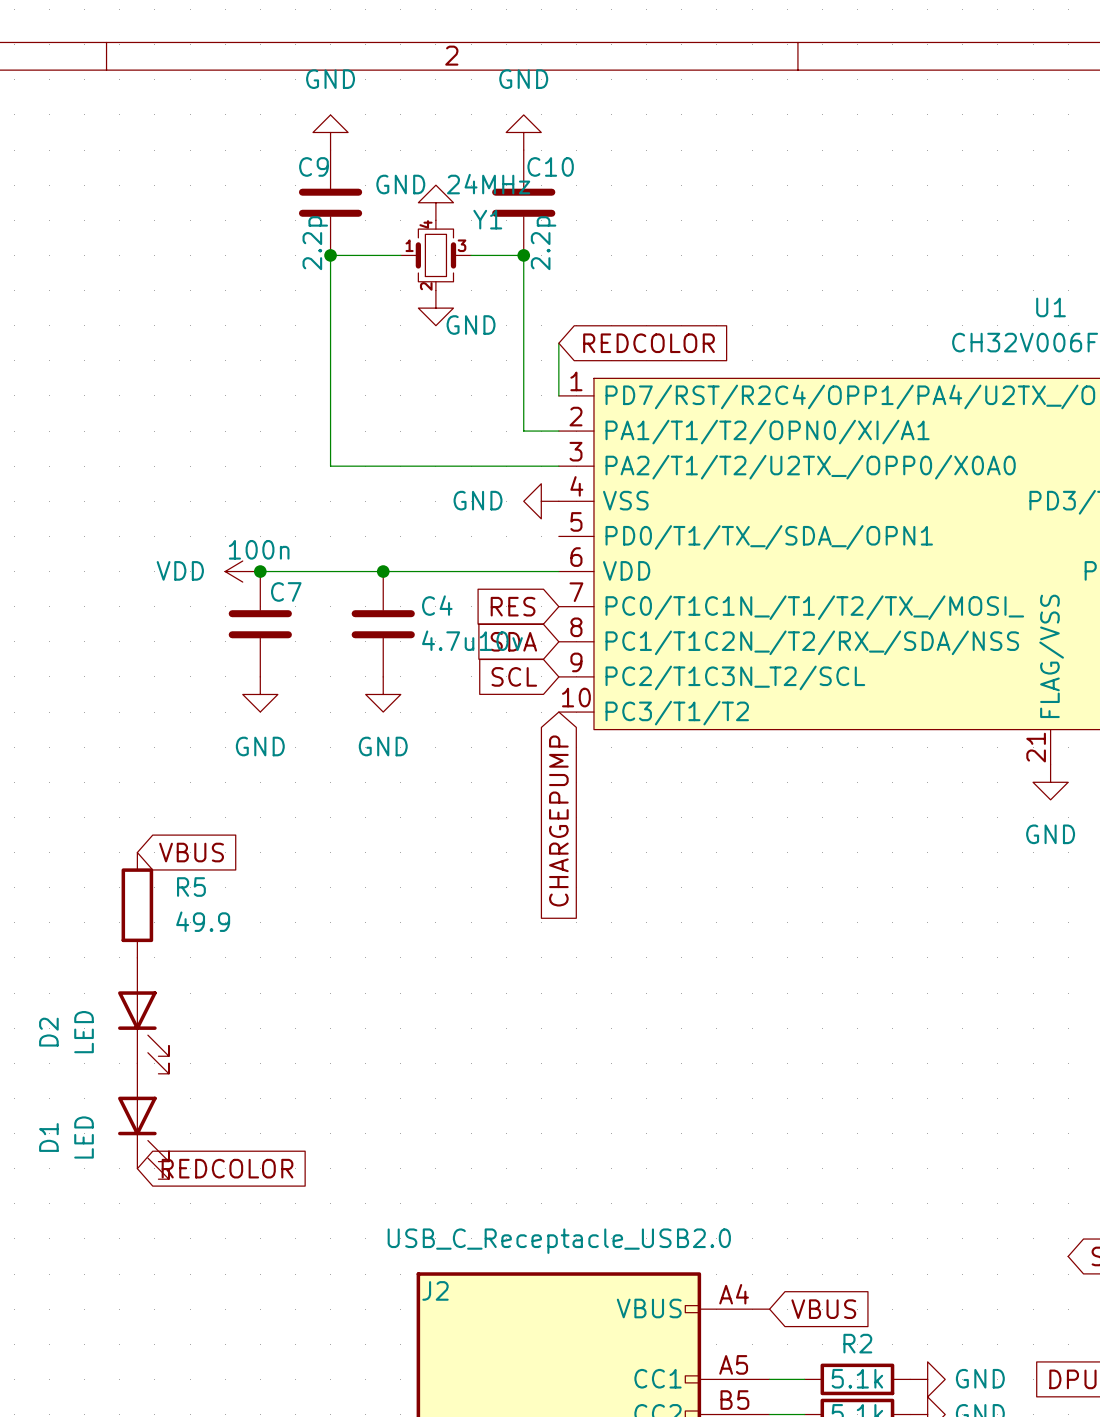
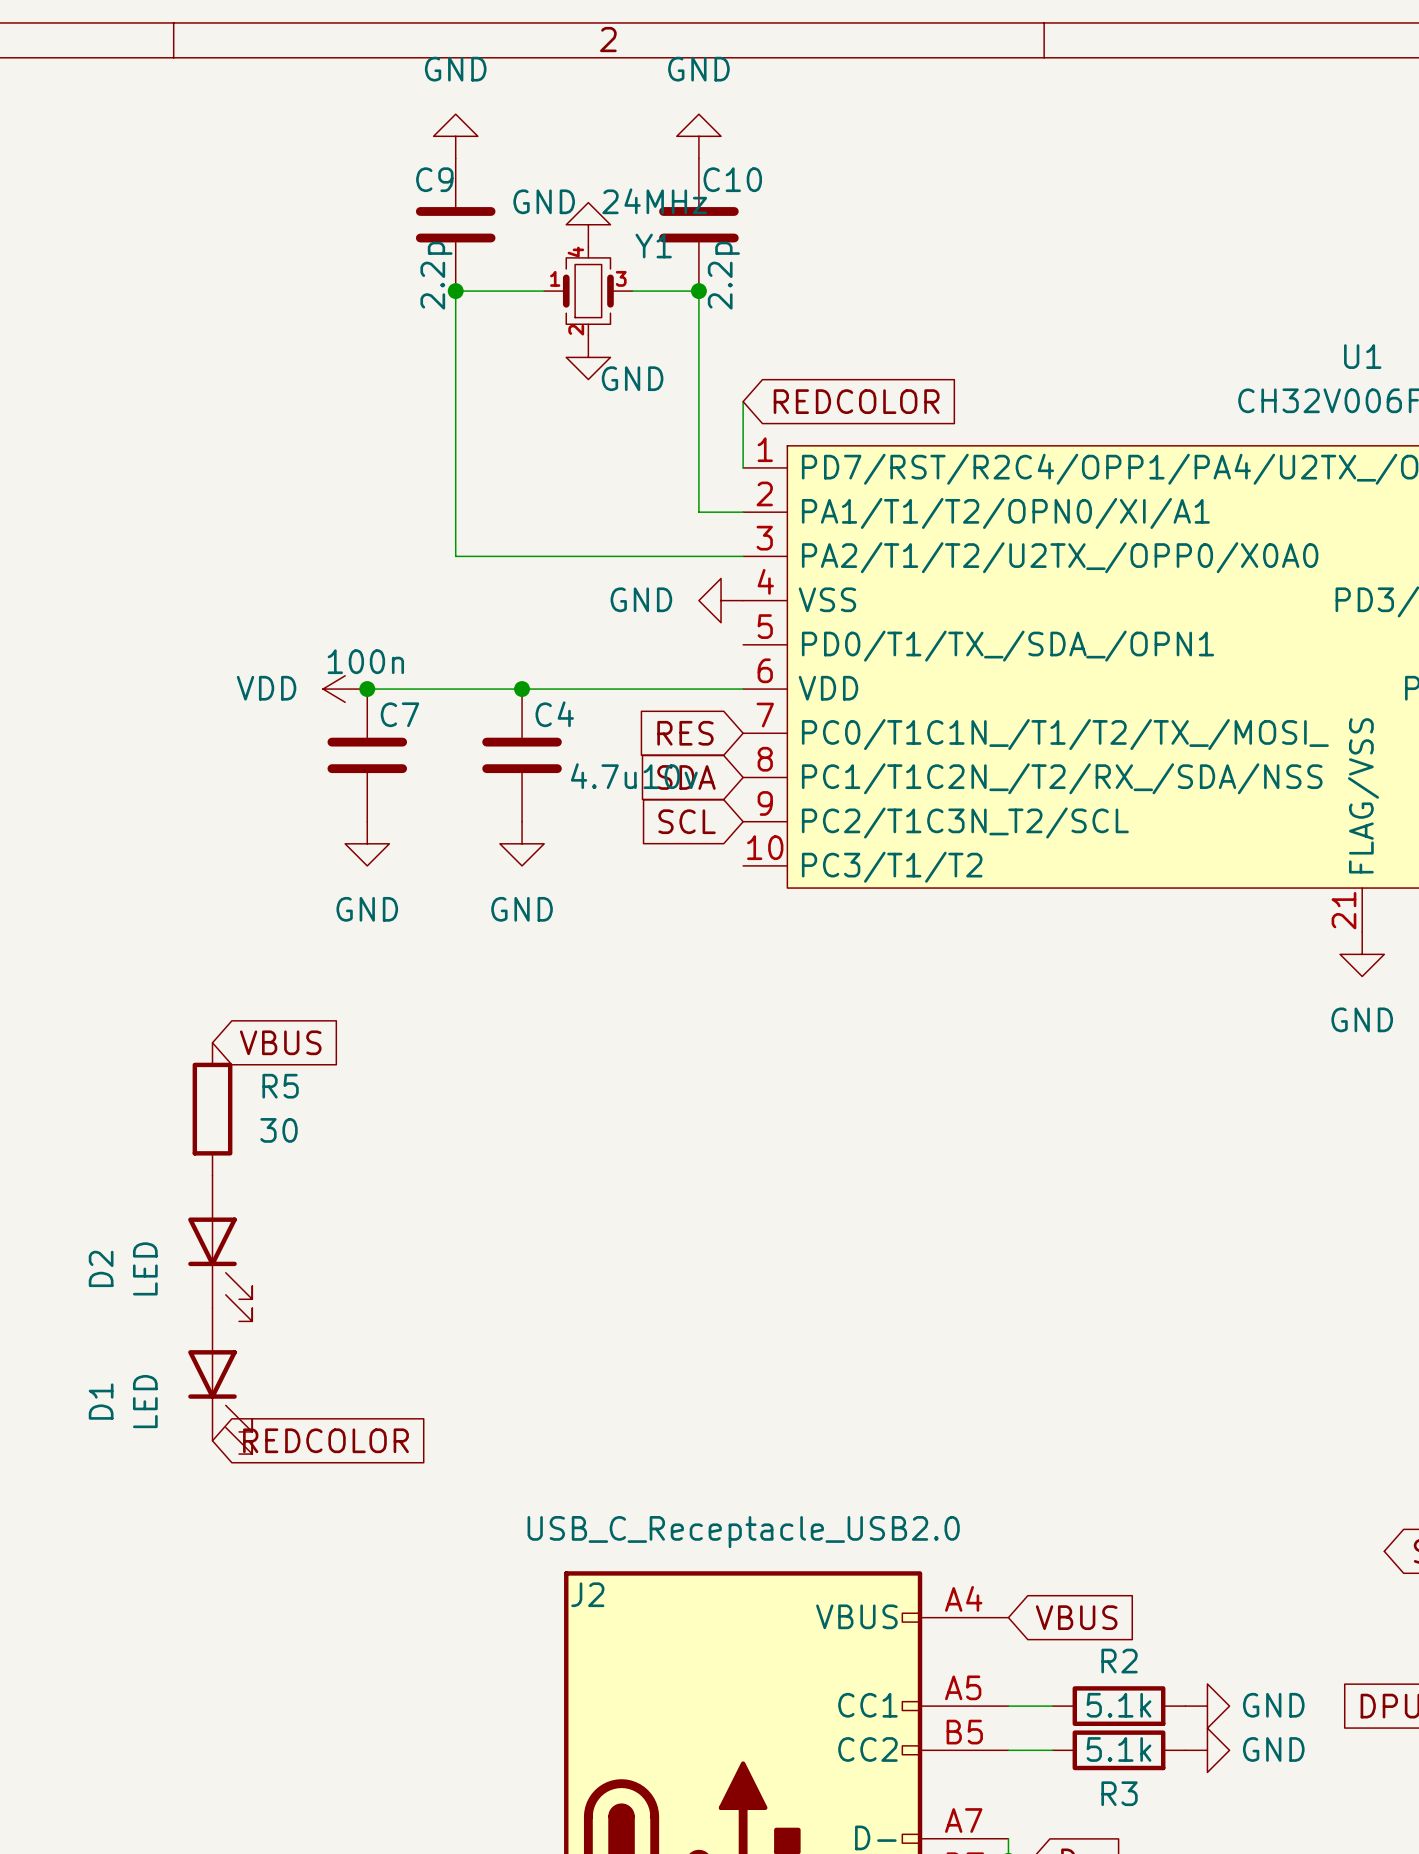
C4 name position: C4 (437, 605) -> C4 (554, 714)
global label: CHARGEPUMP (558, 820) -> none
R5 value: 49.9 (203, 921) -> 30 (279, 1130)

